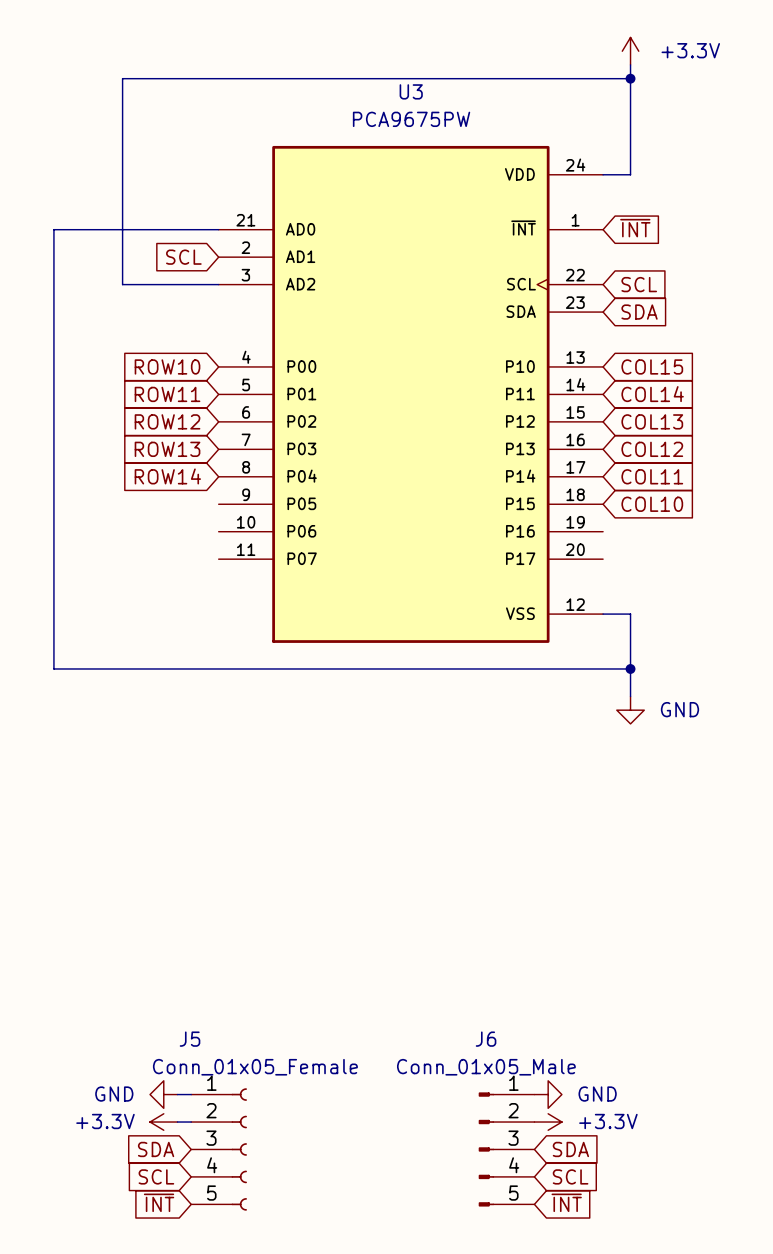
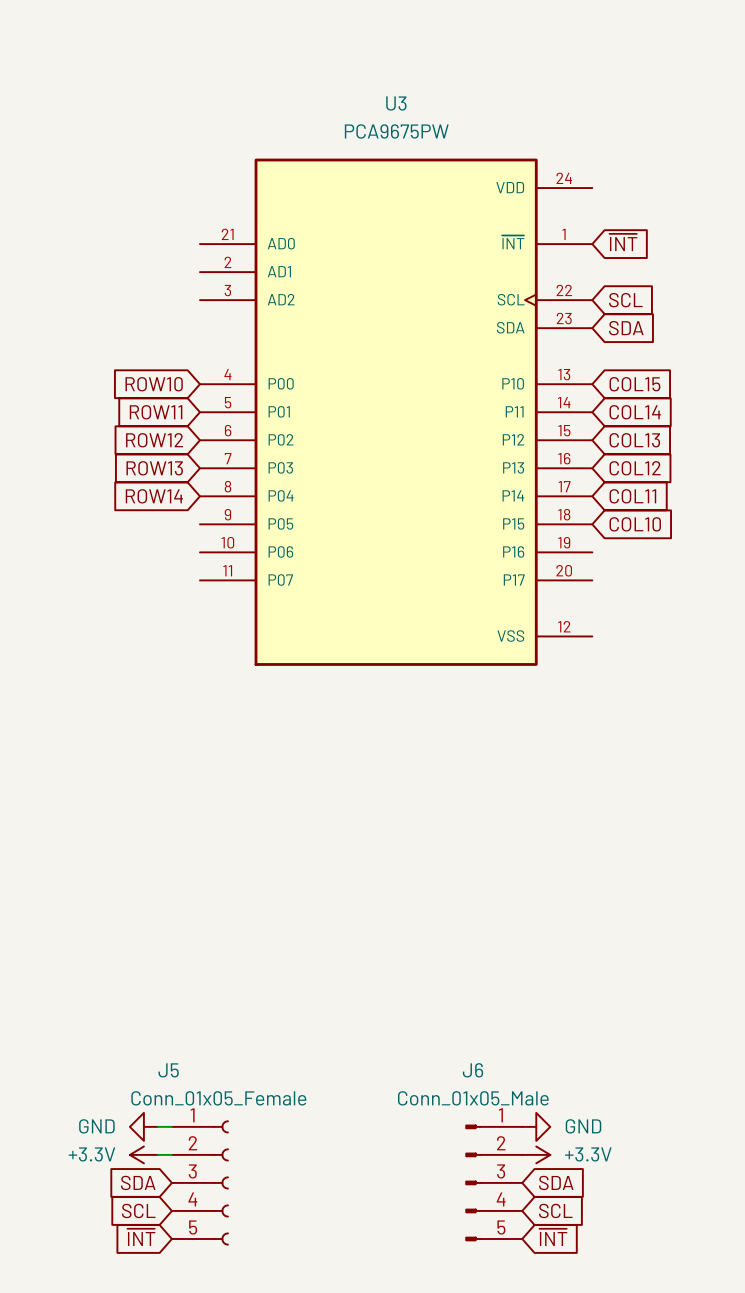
power symbol: +3.3V (630, 51) -> none
wire: (630, 64) (630, 174) (603, 174) -> none
wire: (630, 78) (122, 78) (122, 284) (218, 284) -> none
junction: (630, 78) -> none
wire: (218, 229) (53, 229) (53, 668) (630, 668) -> none
global label: SCL (183, 257) -> none
wire: (603, 614) (630, 614) (630, 696) -> none
junction: (630, 668) -> none
power symbol: GND (630, 710) -> none

